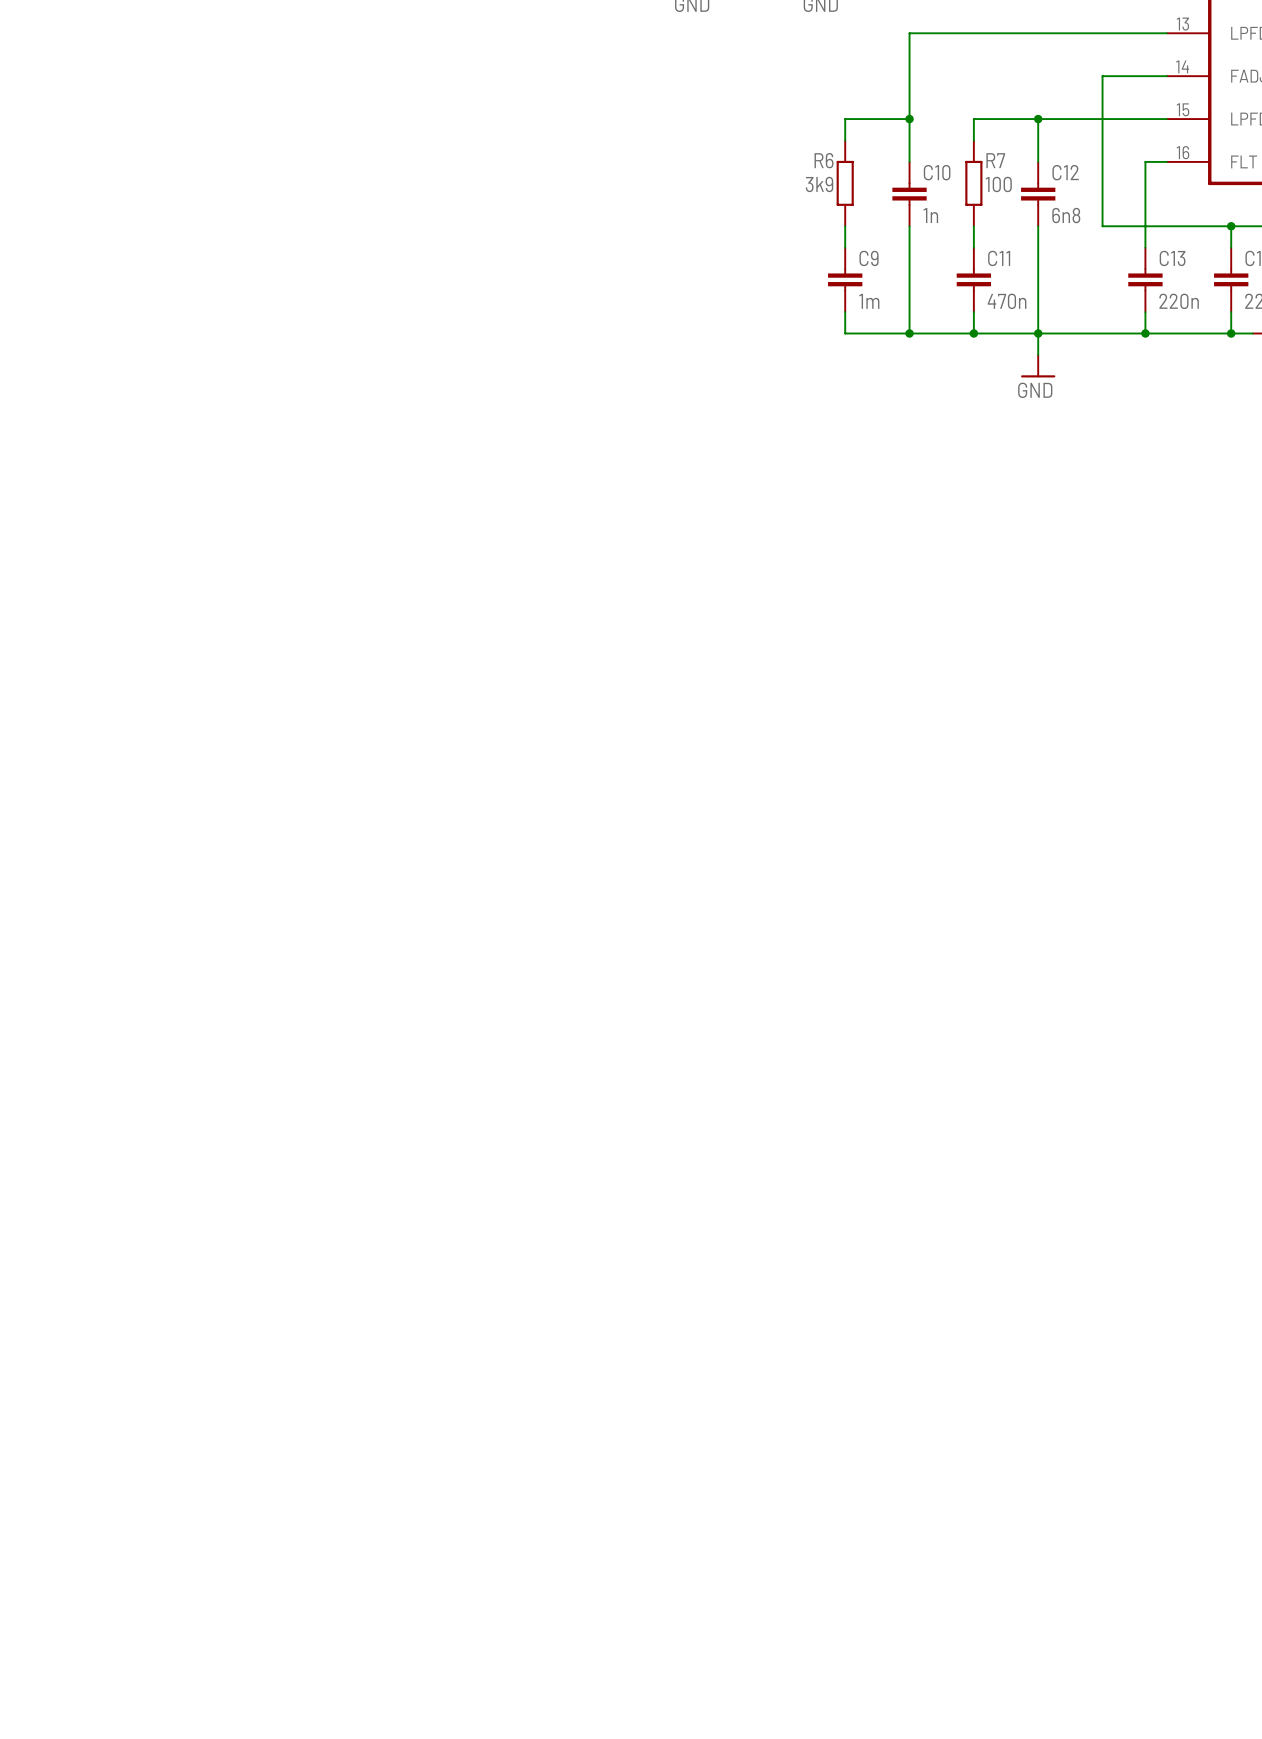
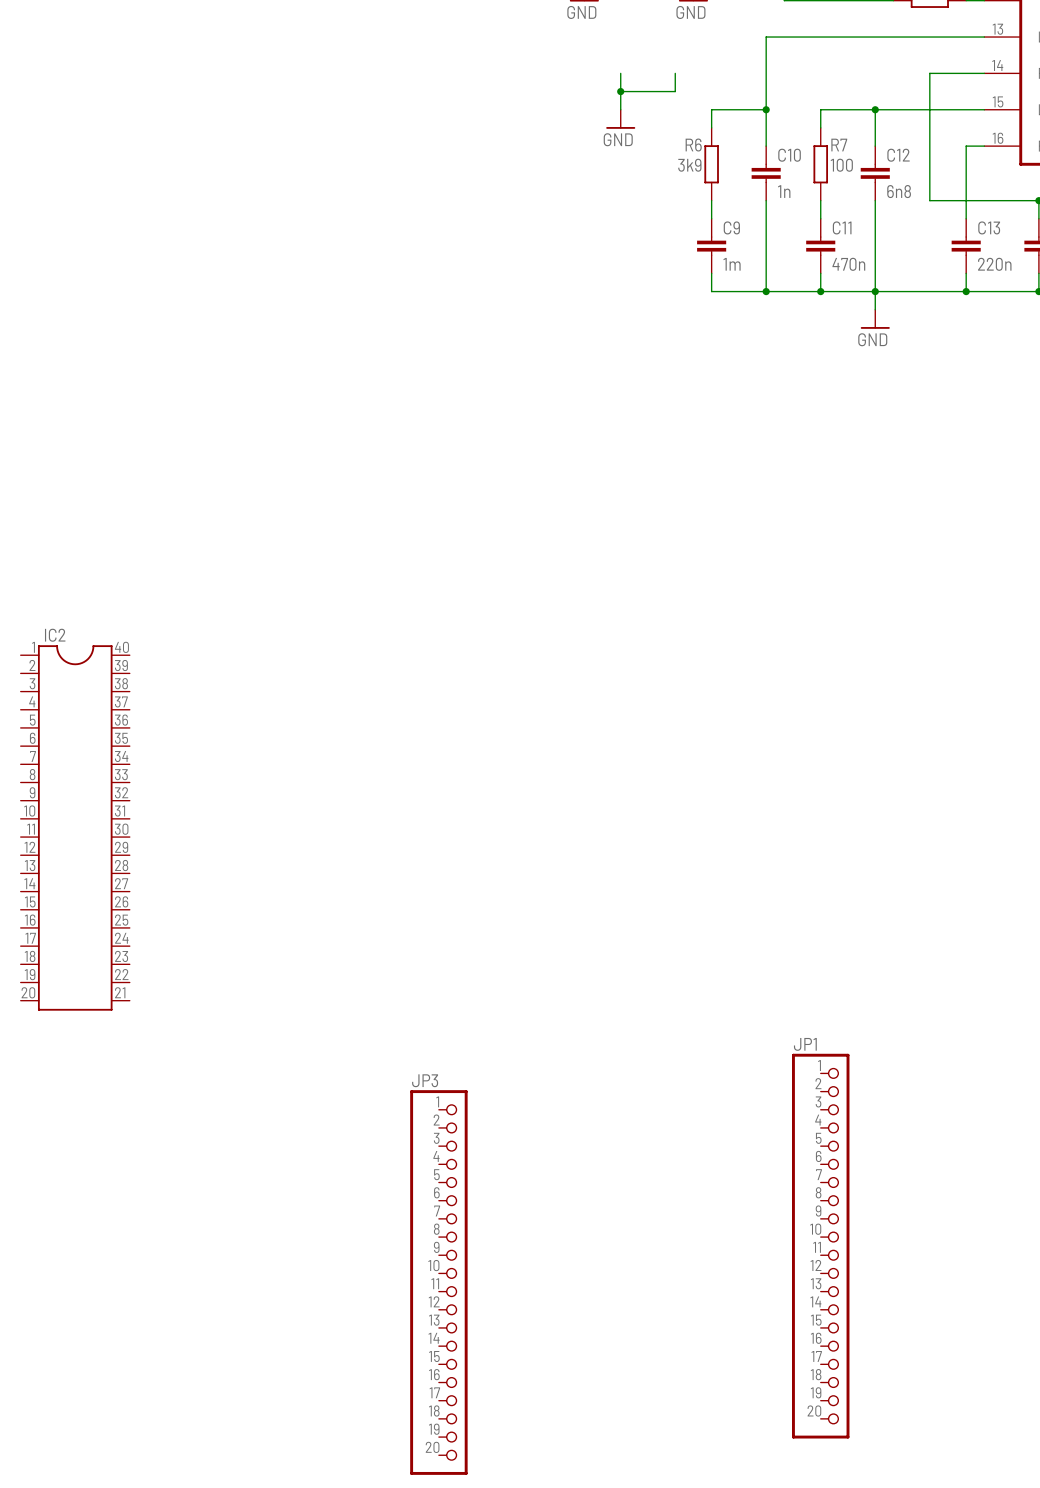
wire: none -> (620, 73) (620, 109)
wire: none -> (675, 73) (675, 91) (620, 91)
junction: none -> (620, 91)
power symbol: none -> GND (620, 119)
IC2: none -> (75, 827)
JP1: none -> (820, 1246)
JP3: none -> (438, 1282)

